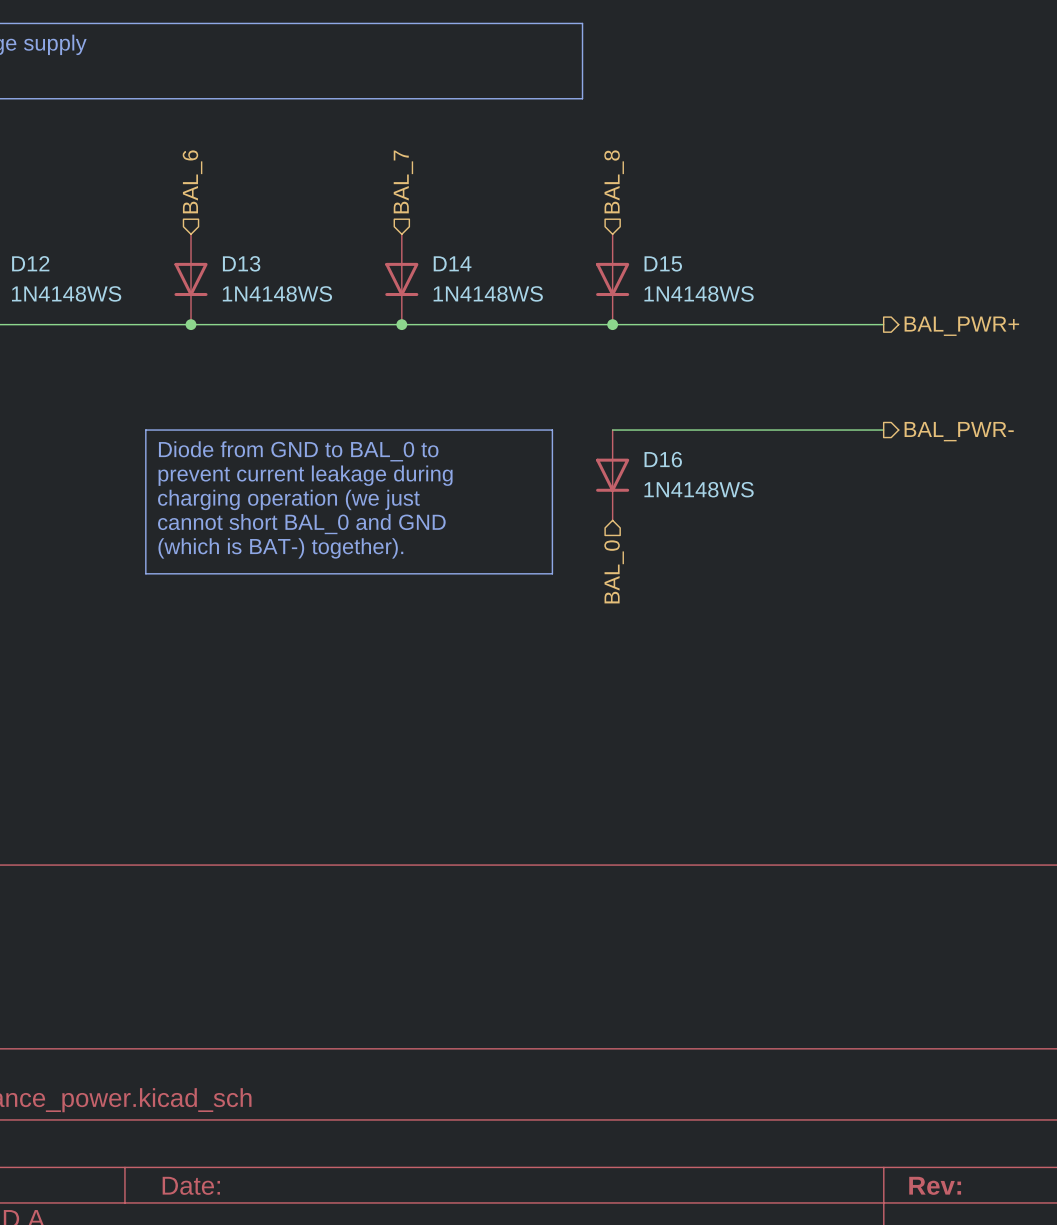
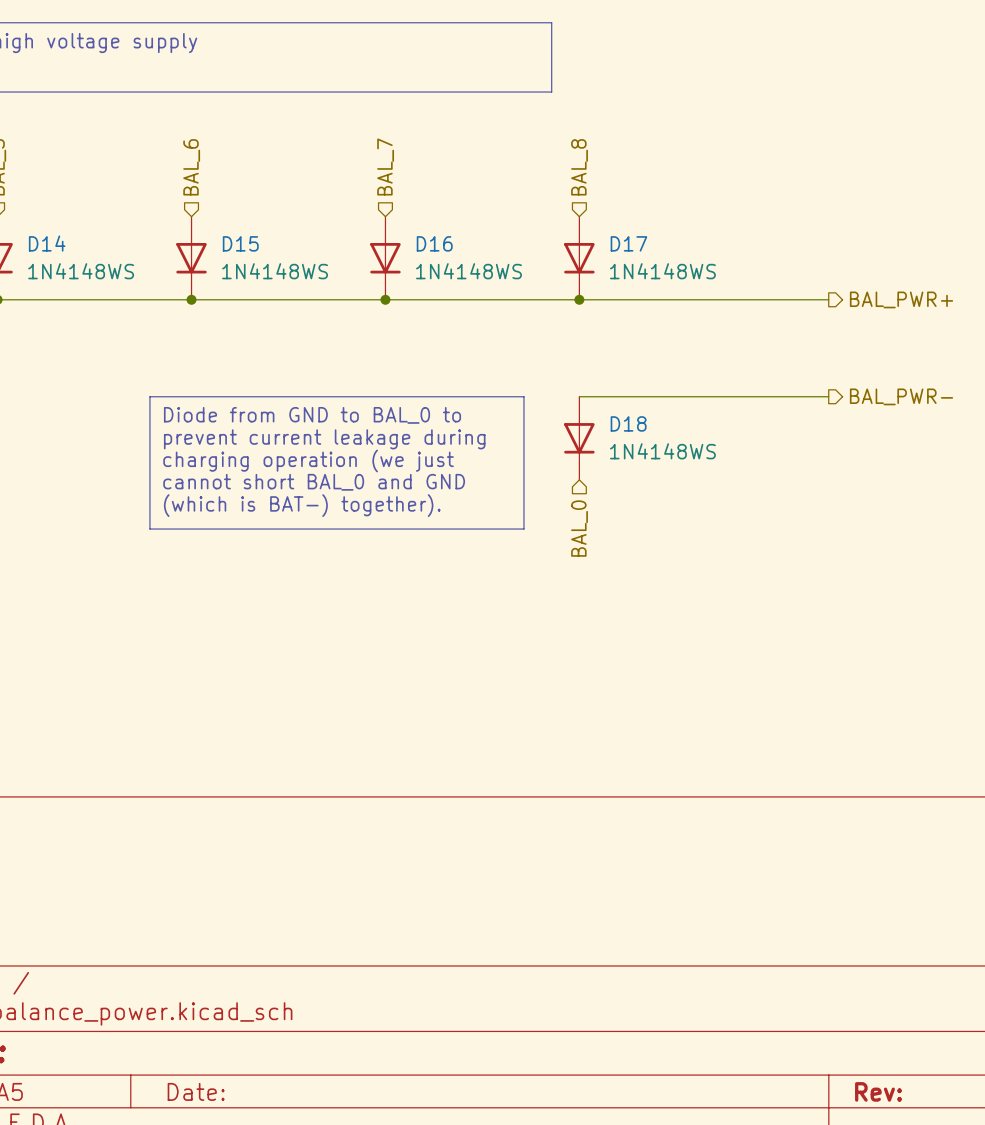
D12 name: D12 (30, 263) -> D14 (47, 243)
D13 name: D13 (241, 263) -> D15 (240, 243)
D14 name: D14 (452, 263) -> D16 (434, 243)
D15 name: D15 (663, 263) -> D17 (628, 243)
D16 name: D16 (663, 459) -> D18 (628, 423)

